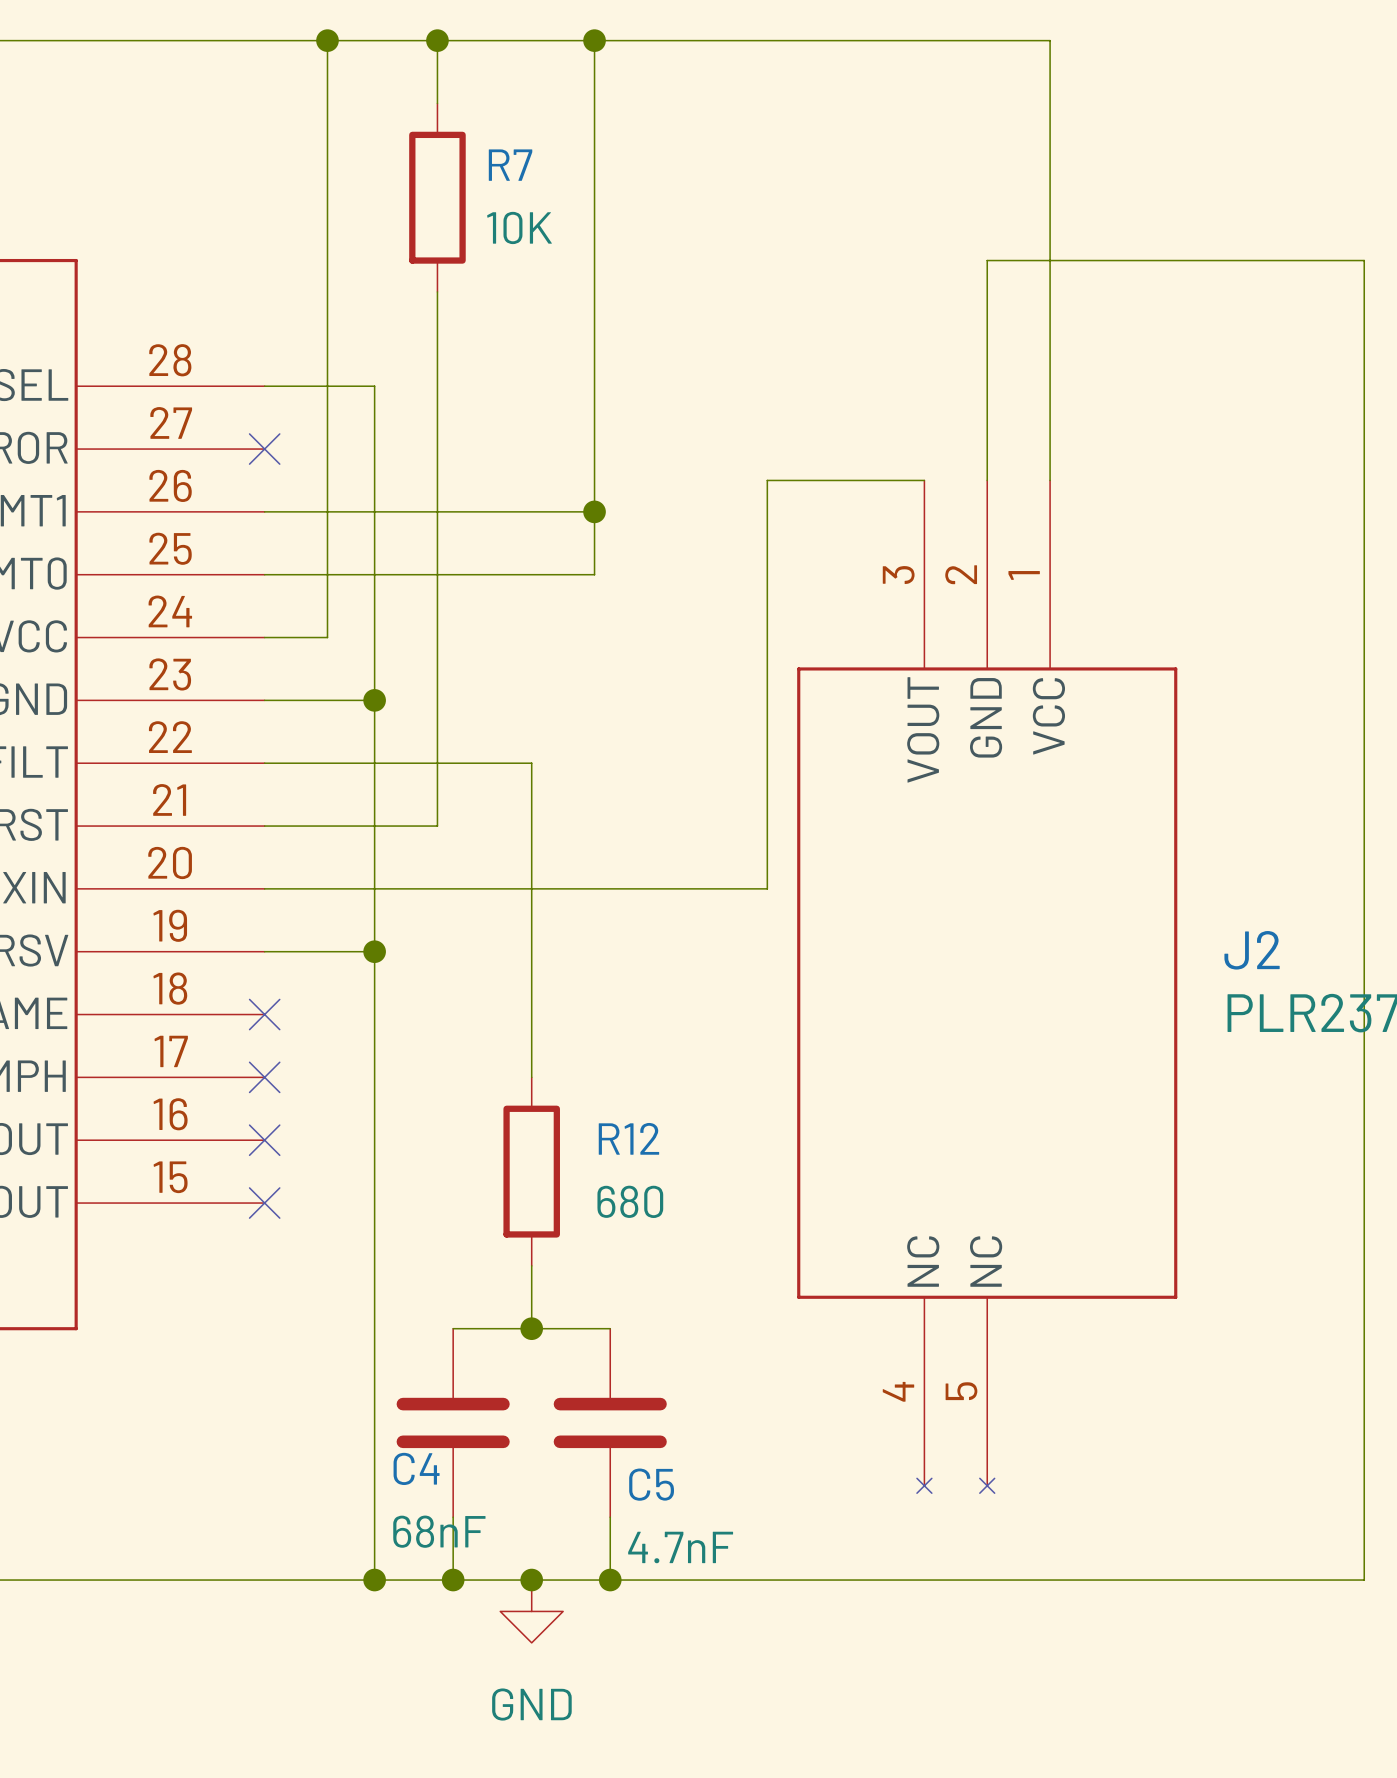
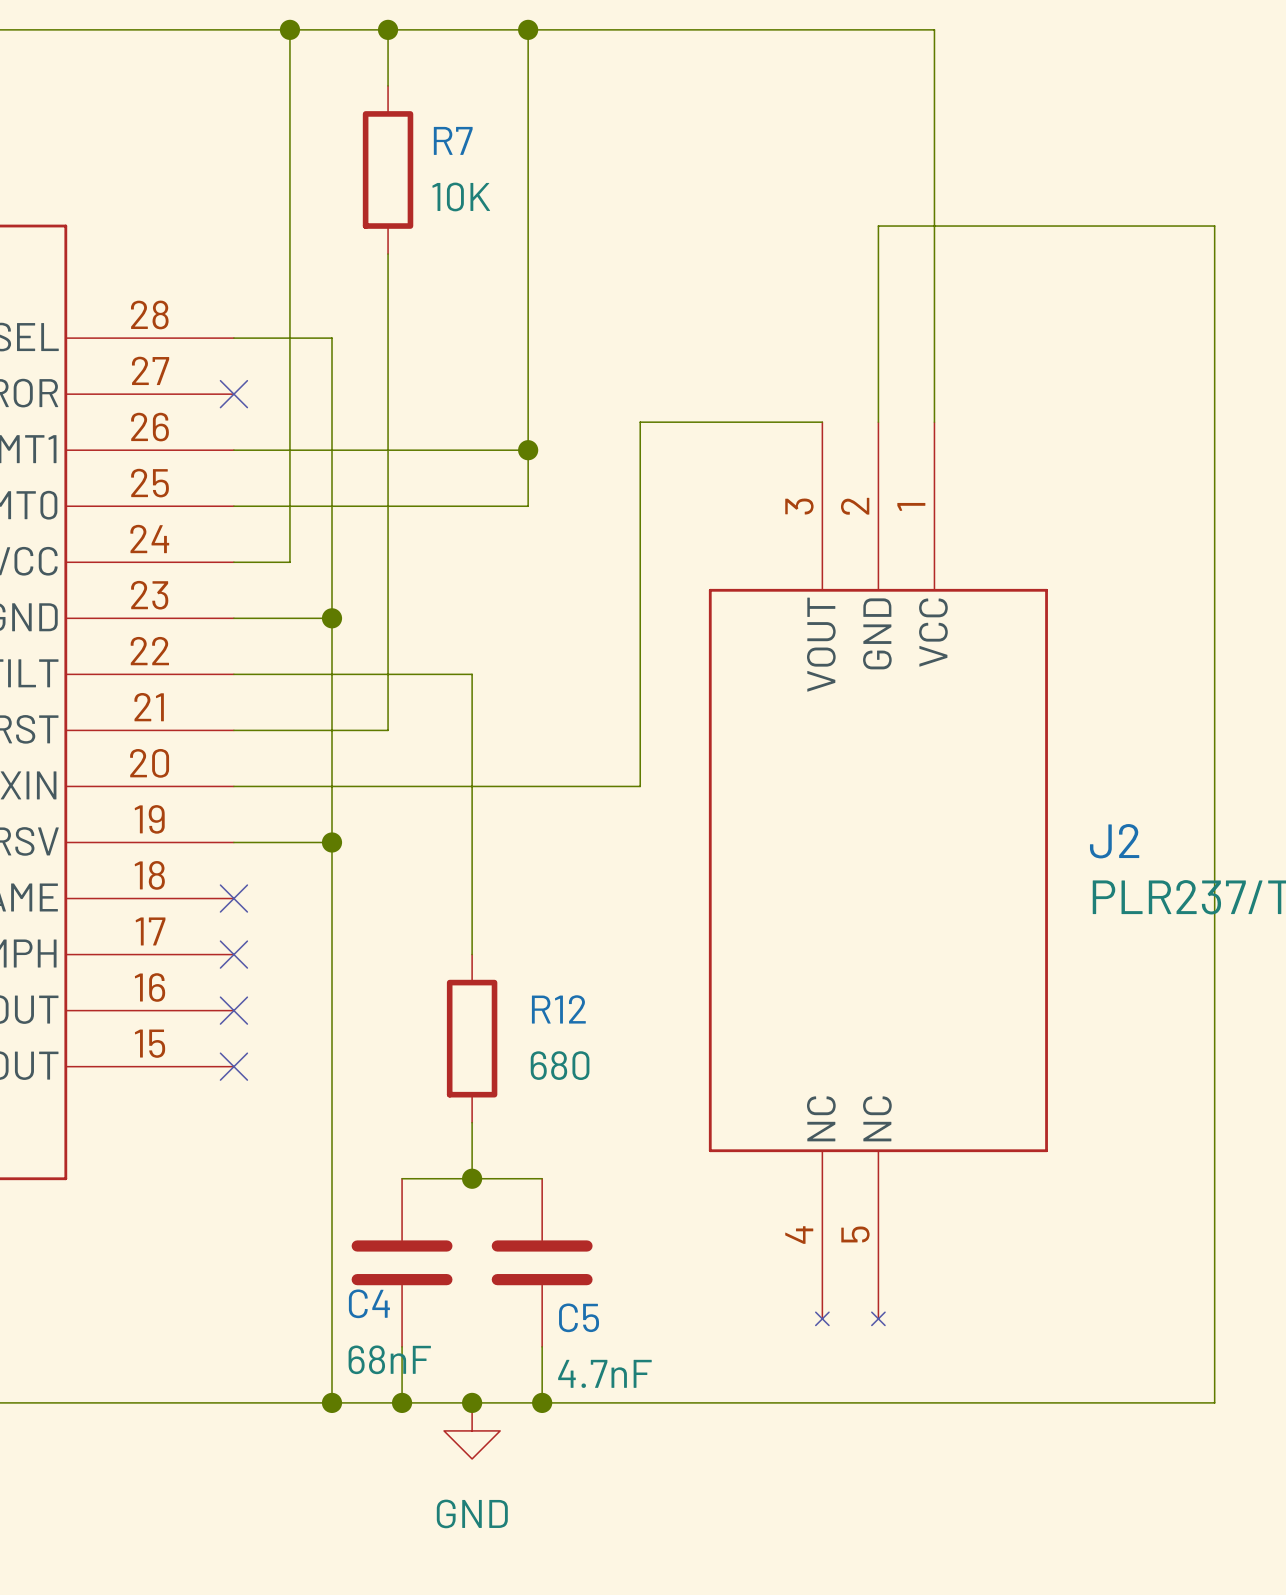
wire: (767, 480) (767, 888) (720, 888) -> (682, 422) (640, 422) (640, 786)

